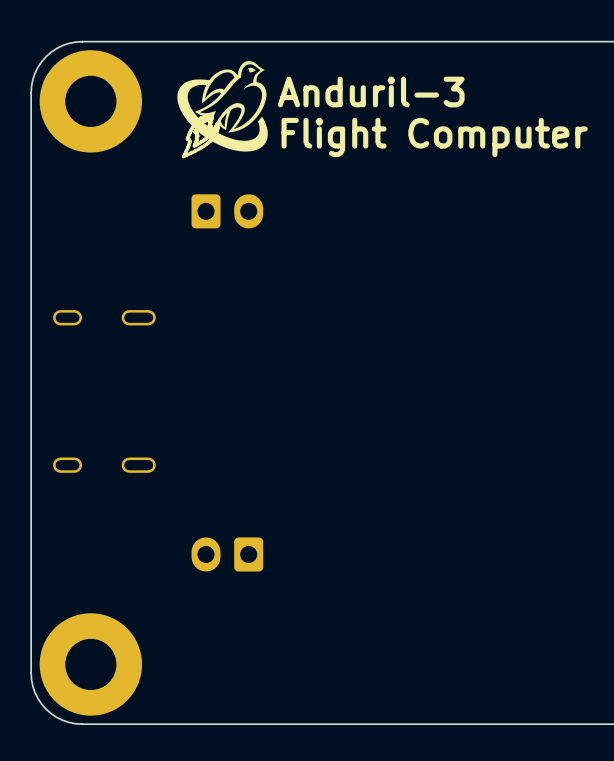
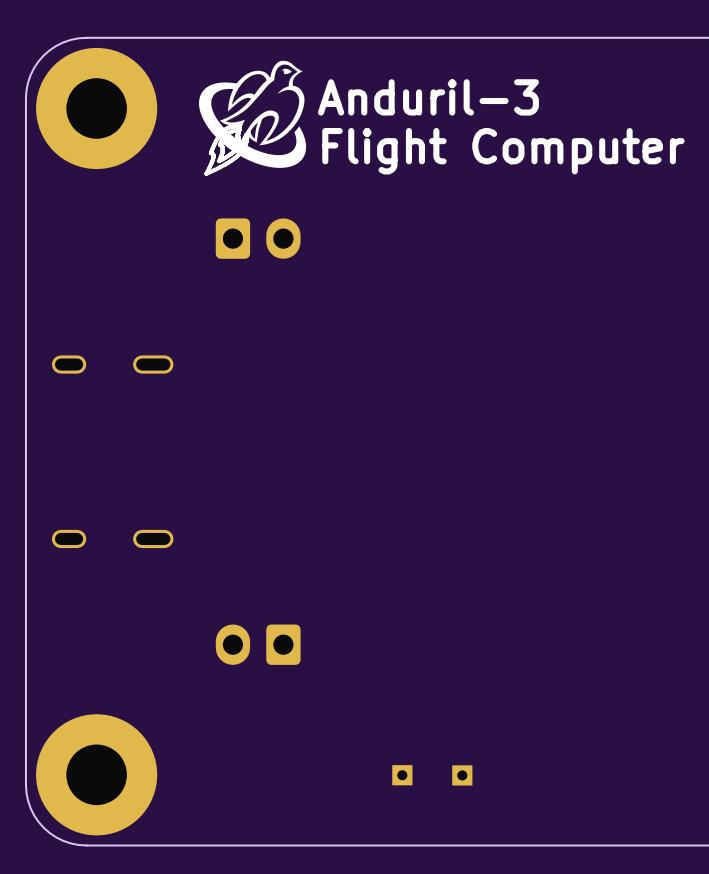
part: none -> (402, 775)
part: none -> (462, 775)

